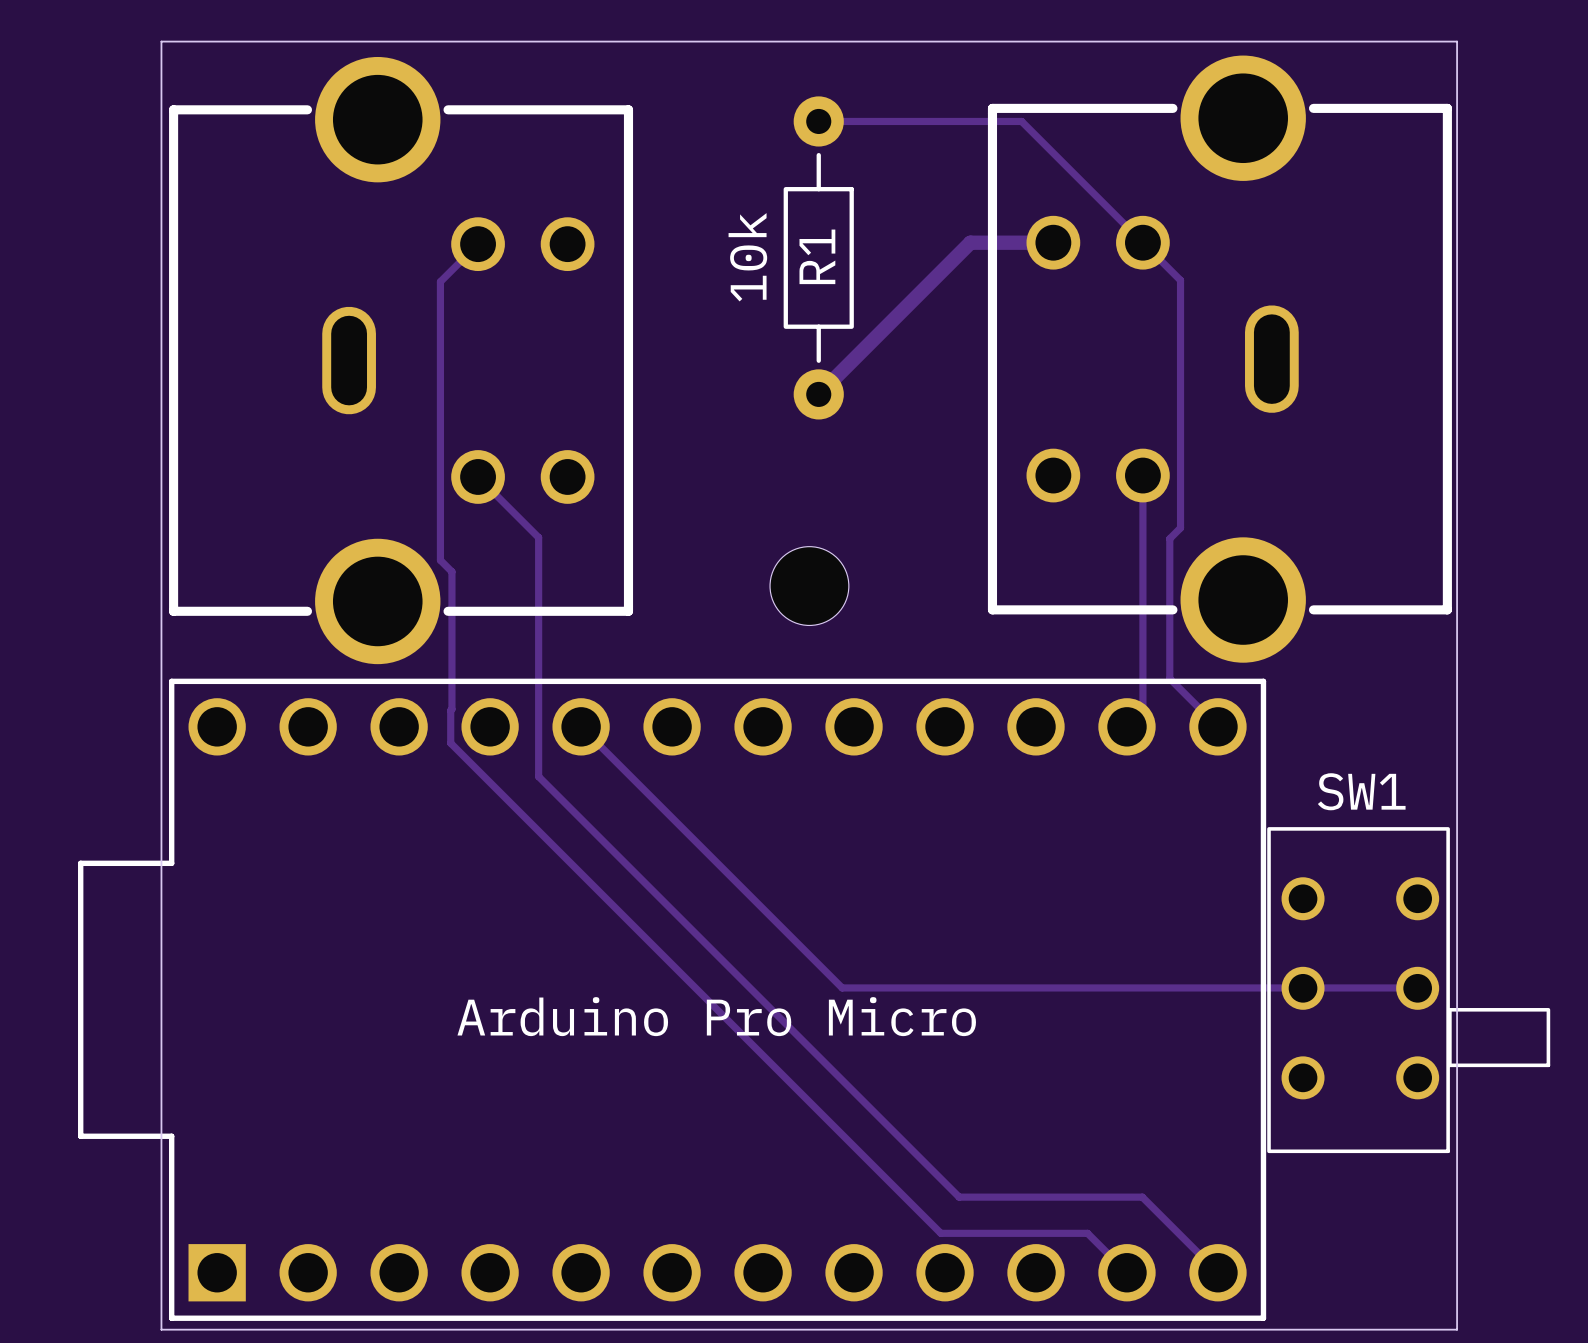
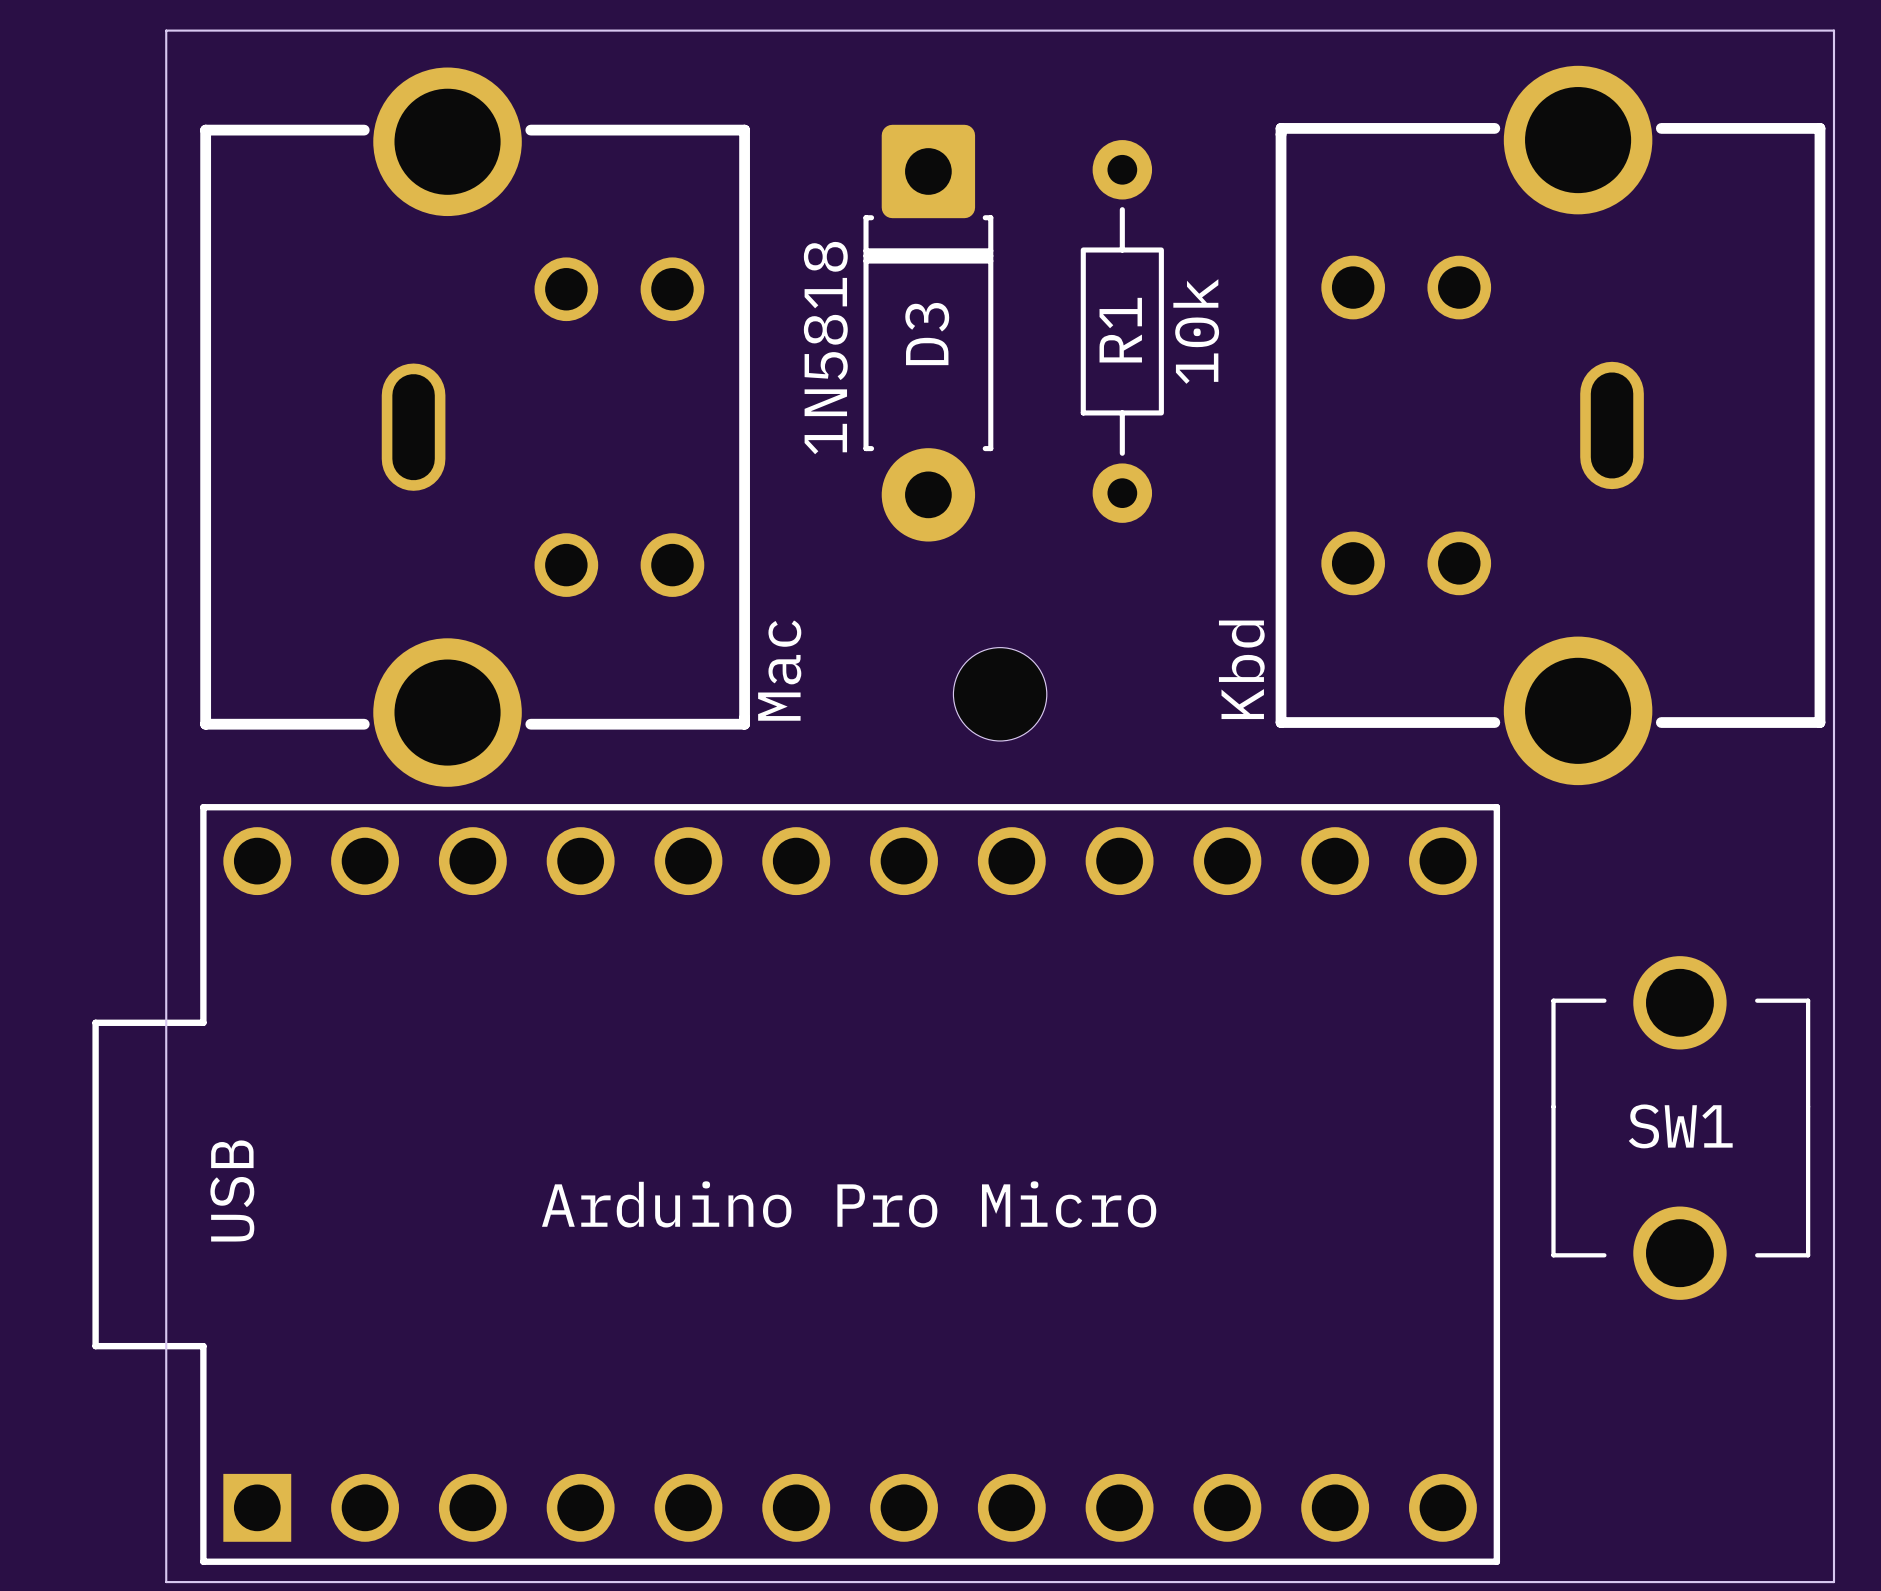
board edge: (161, 41) (1457, 41) (1457, 1329) (161, 1329) (161, 41) -> (166, 30) (166, 1582) (1833, 1582) (1833, 30) (166, 30)
track: (818, 121) (1021, 121) (1180, 280) (1180, 528) (1169, 538) (1169, 678) (1217, 726) -> none
track: (1053, 242) (970, 242) (818, 394) -> none
track: (478, 244) (440, 281) (440, 560) (451, 571) (450, 743) (940, 1233) (1087, 1233) (1126, 1272) -> none
R1 value position: 10k (747, 257) -> 10k (1196, 331)
R1 position: (818, 257) -> (1122, 331)
D3: none -> 1N5818 (928, 333)
part position: (1219, 359) -> (1550, 425)
track: (1142, 475) (1142, 710) (1126, 726) -> none
track: (478, 476) (538, 537) (538, 776) (959, 1197) (1142, 1197) (1217, 1272) -> none
text: none -> Kbd (1241, 669)
text: none -> Mac (779, 670)
part position: (809, 586) -> (1000, 694)
track: (581, 726) (842, 987) (1417, 987) -> none
SW1 name position: SW1 (1361, 791) -> SW1 (1680, 1126)
SW1 footprint: [1267, 827, 1551, 1154] -> [1551, 956, 1811, 1300]
text: none -> USB (232, 1190)

